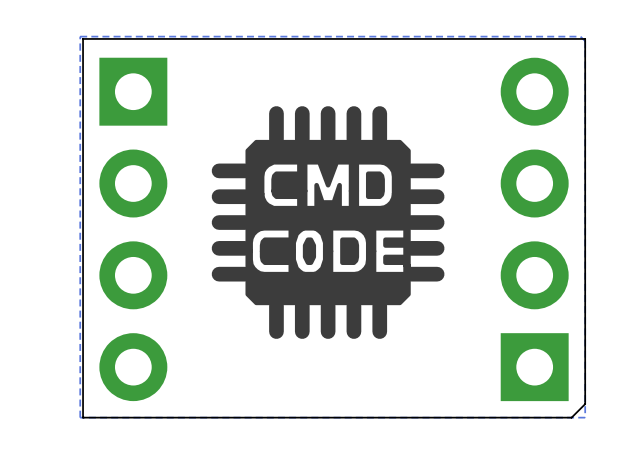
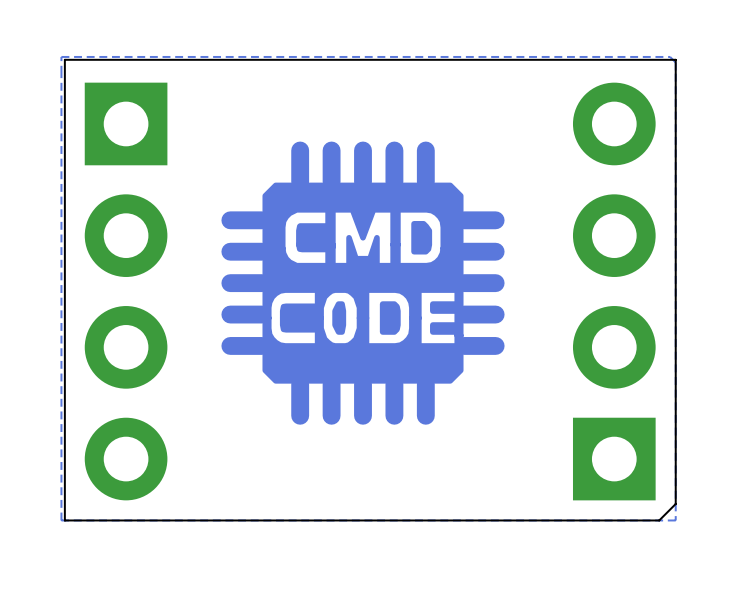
drawing shape: [211, 106, 445, 339] -> [221, 141, 505, 425]

